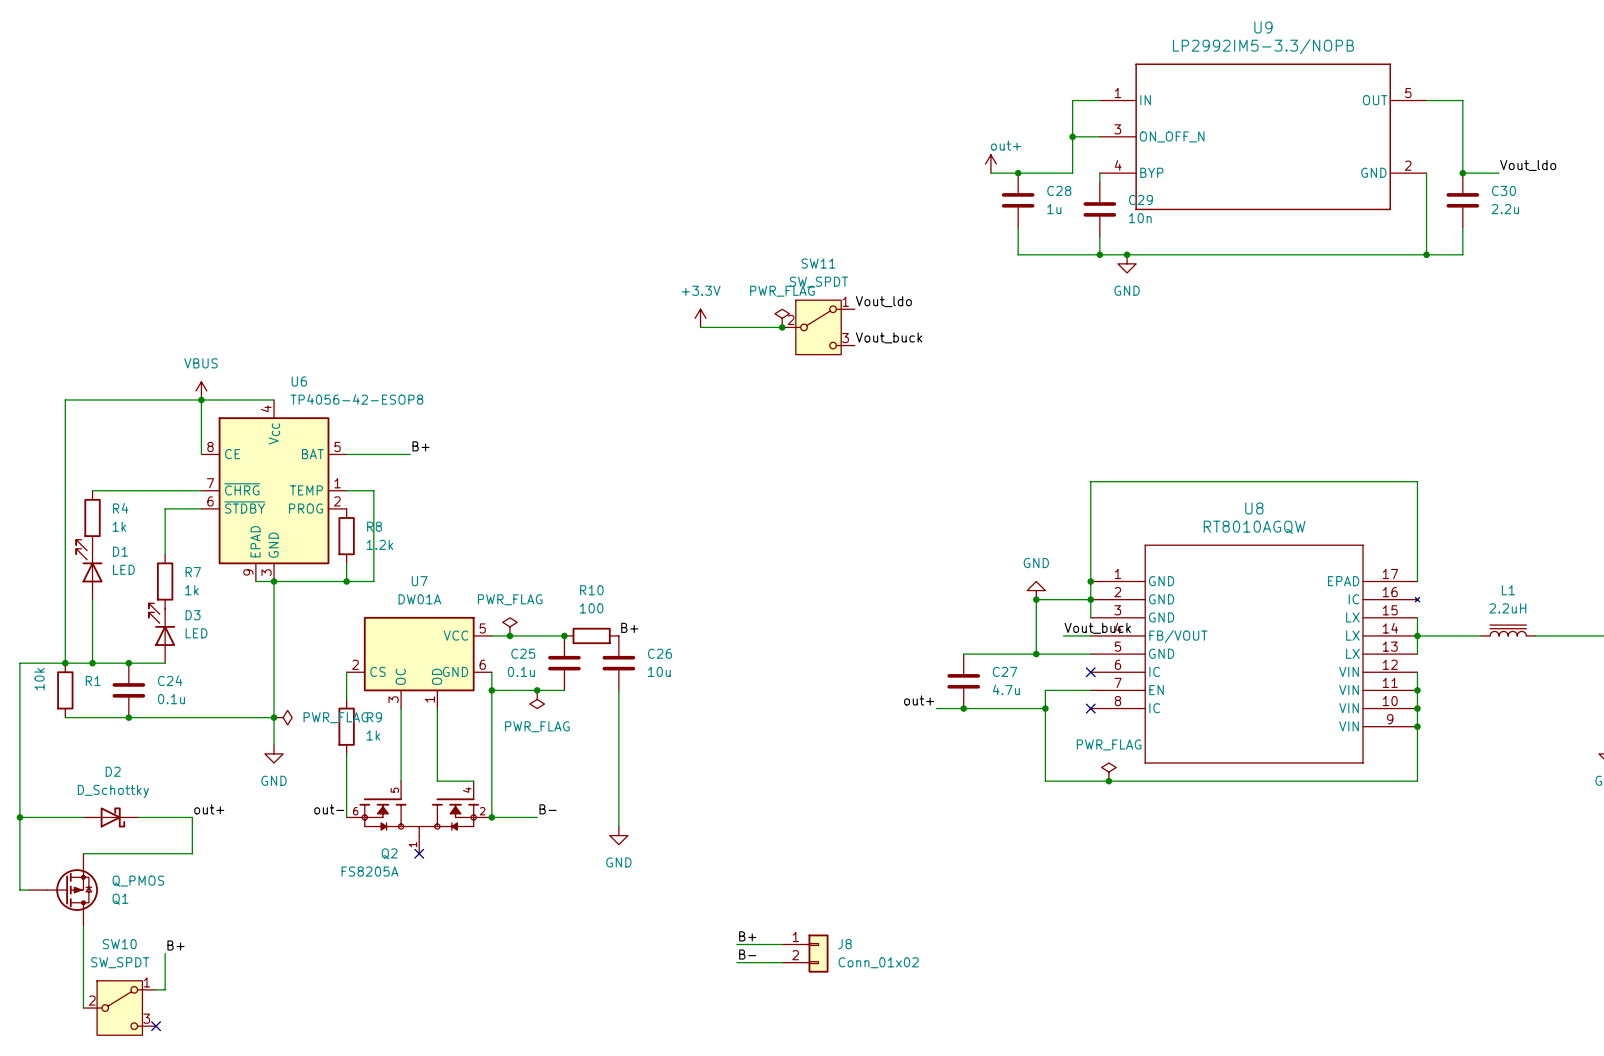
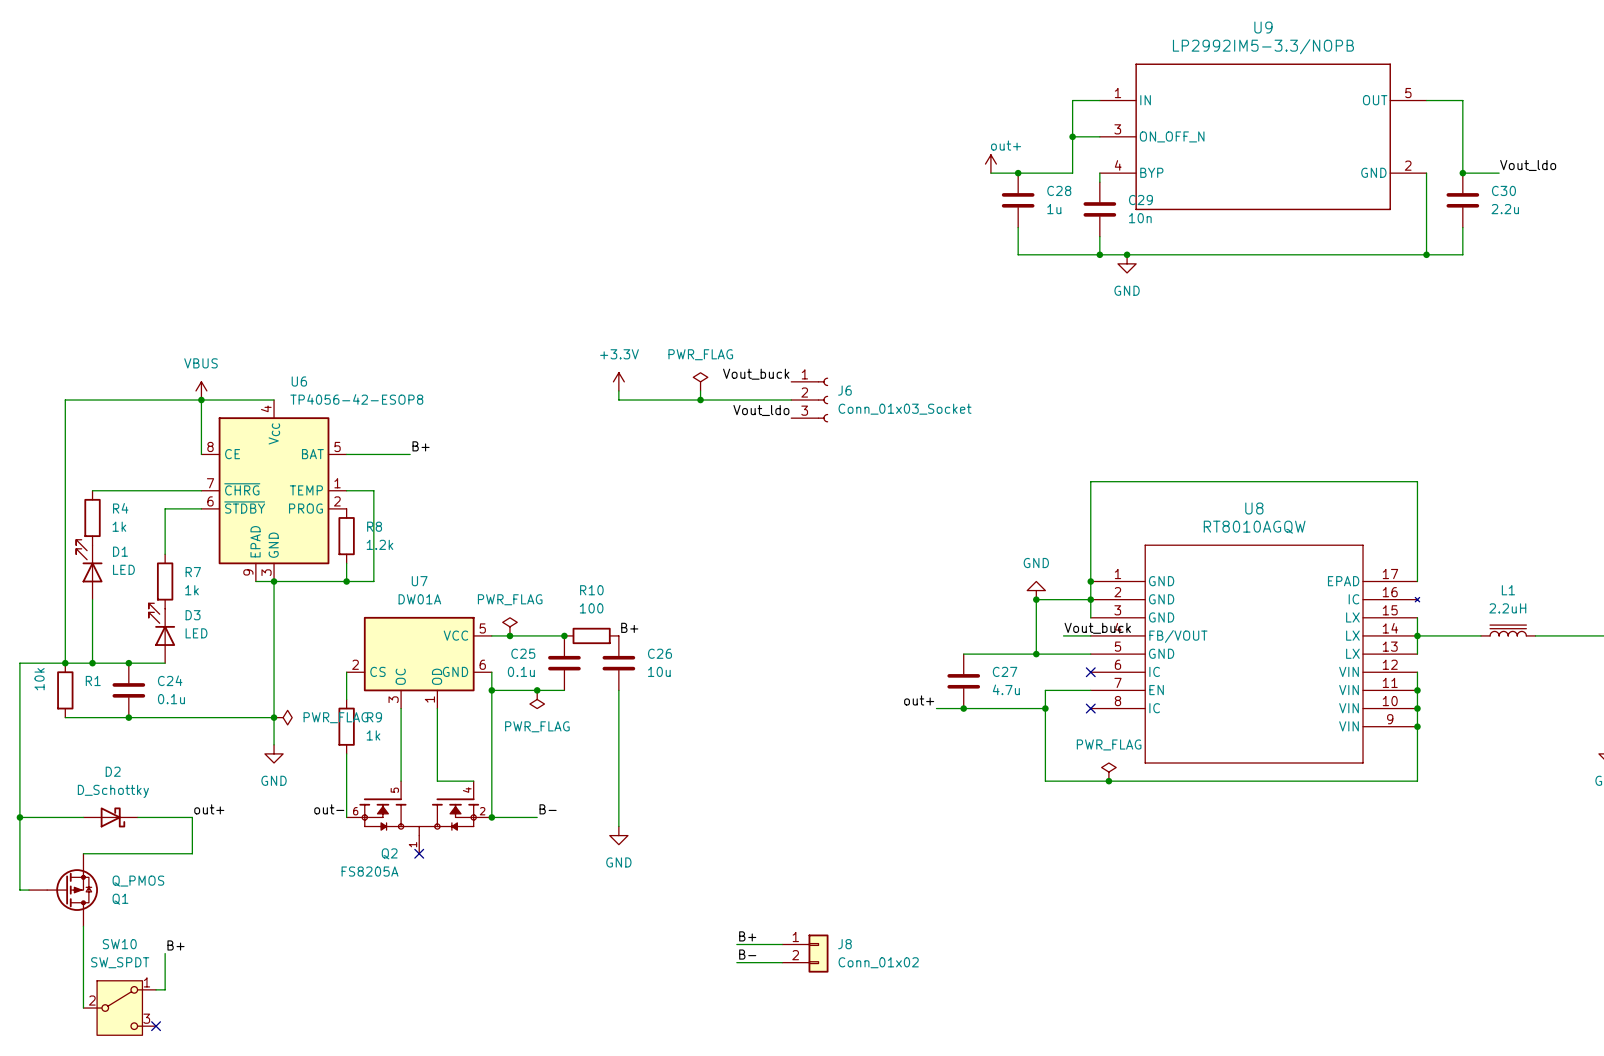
label position: Vout_ldo (883, 301) -> Vout_ldo (761, 410)
power symbol position: +3.3V (700, 318) -> +3.3V (618, 381)
power symbol position: PWR_FLAG (782, 318) -> PWR_FLAG (700, 381)
wire: (700, 327) (782, 327) -> none
junction: (782, 327) -> none
SW11: SW_SPDT (818, 327) -> none
label position: Vout_buck (889, 337) -> Vout_buck (756, 374)
wire: none -> (618, 390) (618, 400) (791, 400)
wire: none -> (700, 390) (700, 400)
junction: none -> (700, 400)
J6: none -> Conn_01x03_Socket (809, 400)

